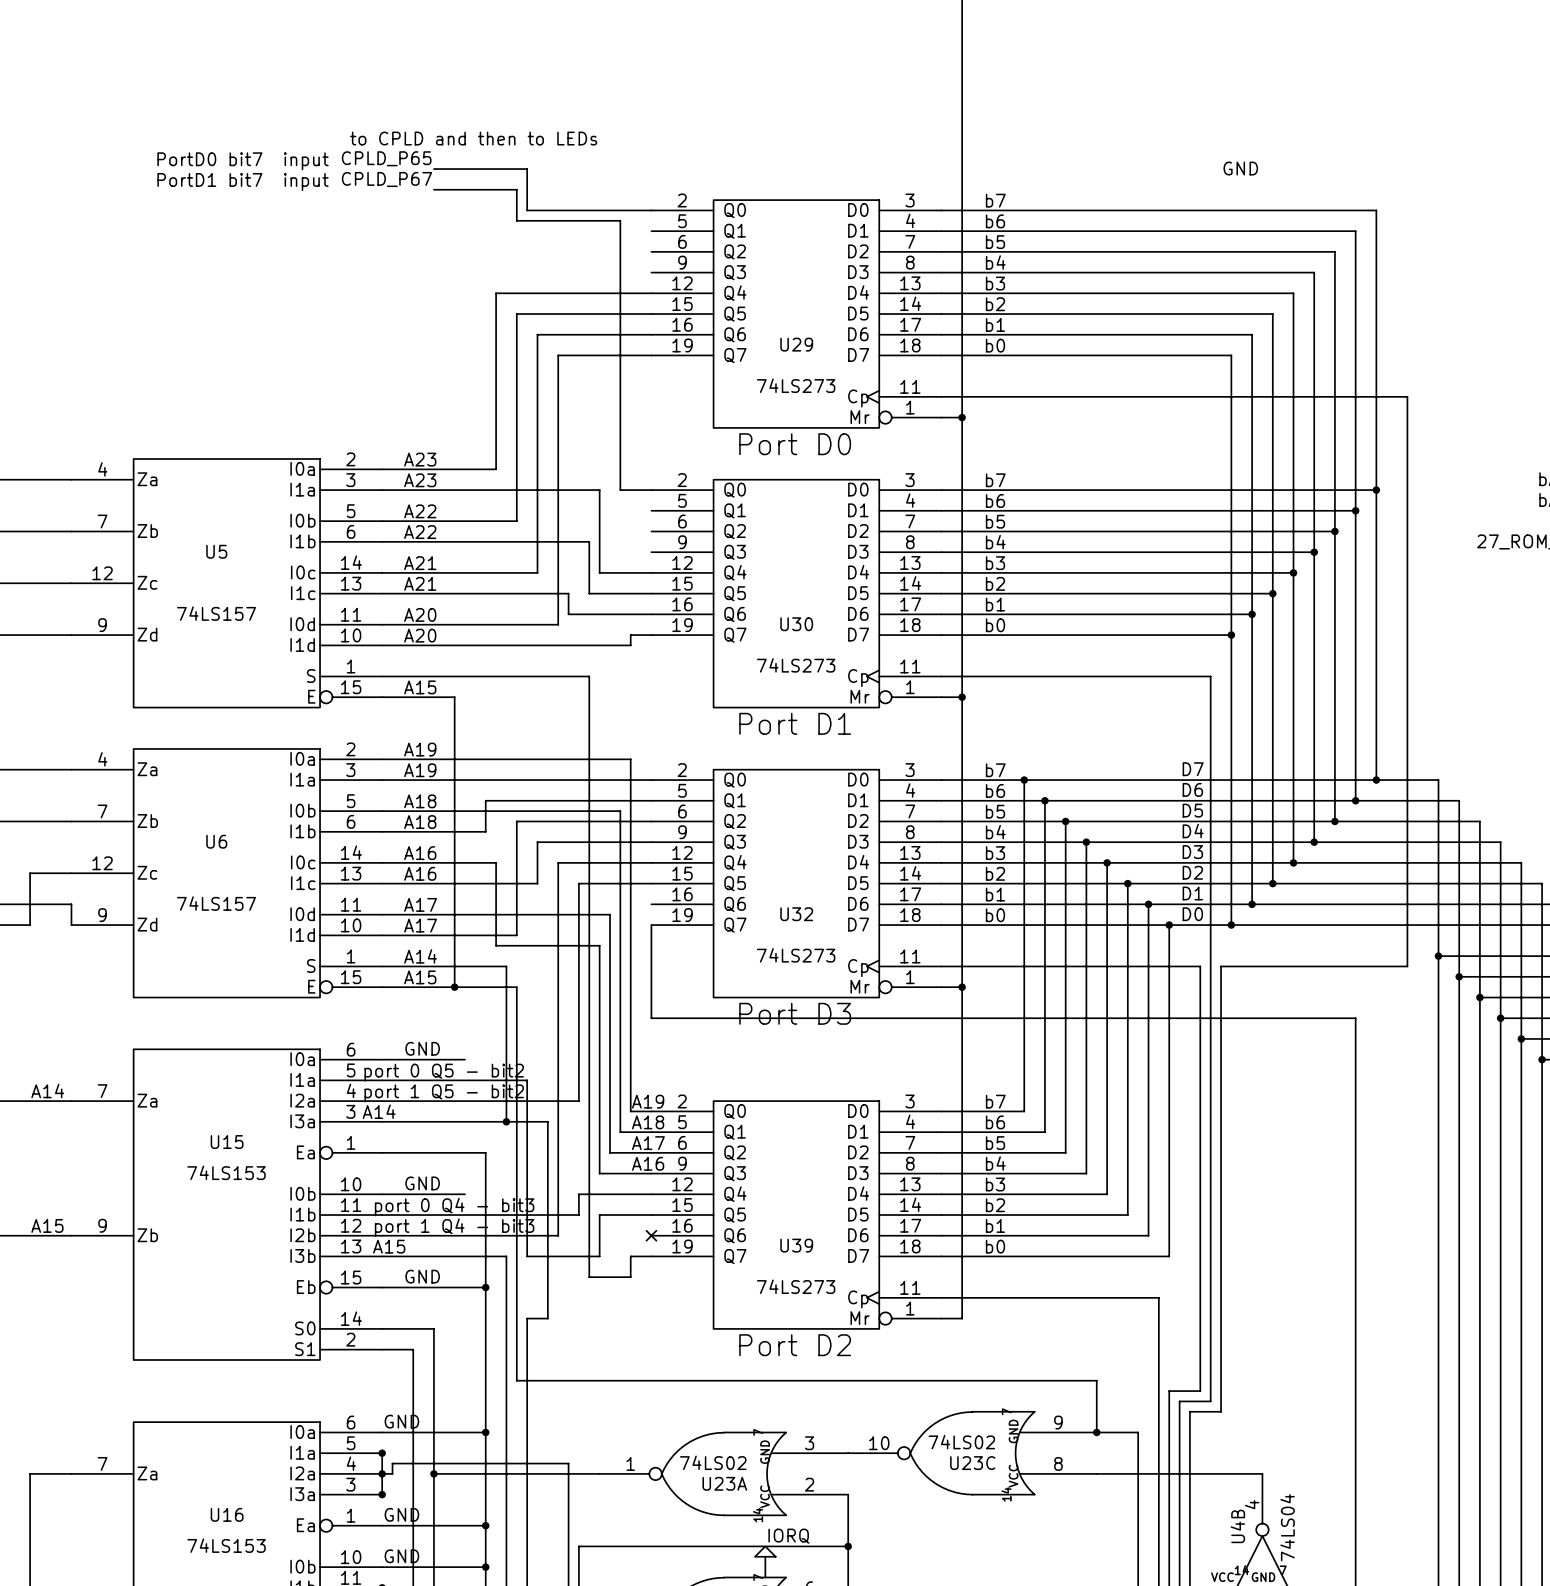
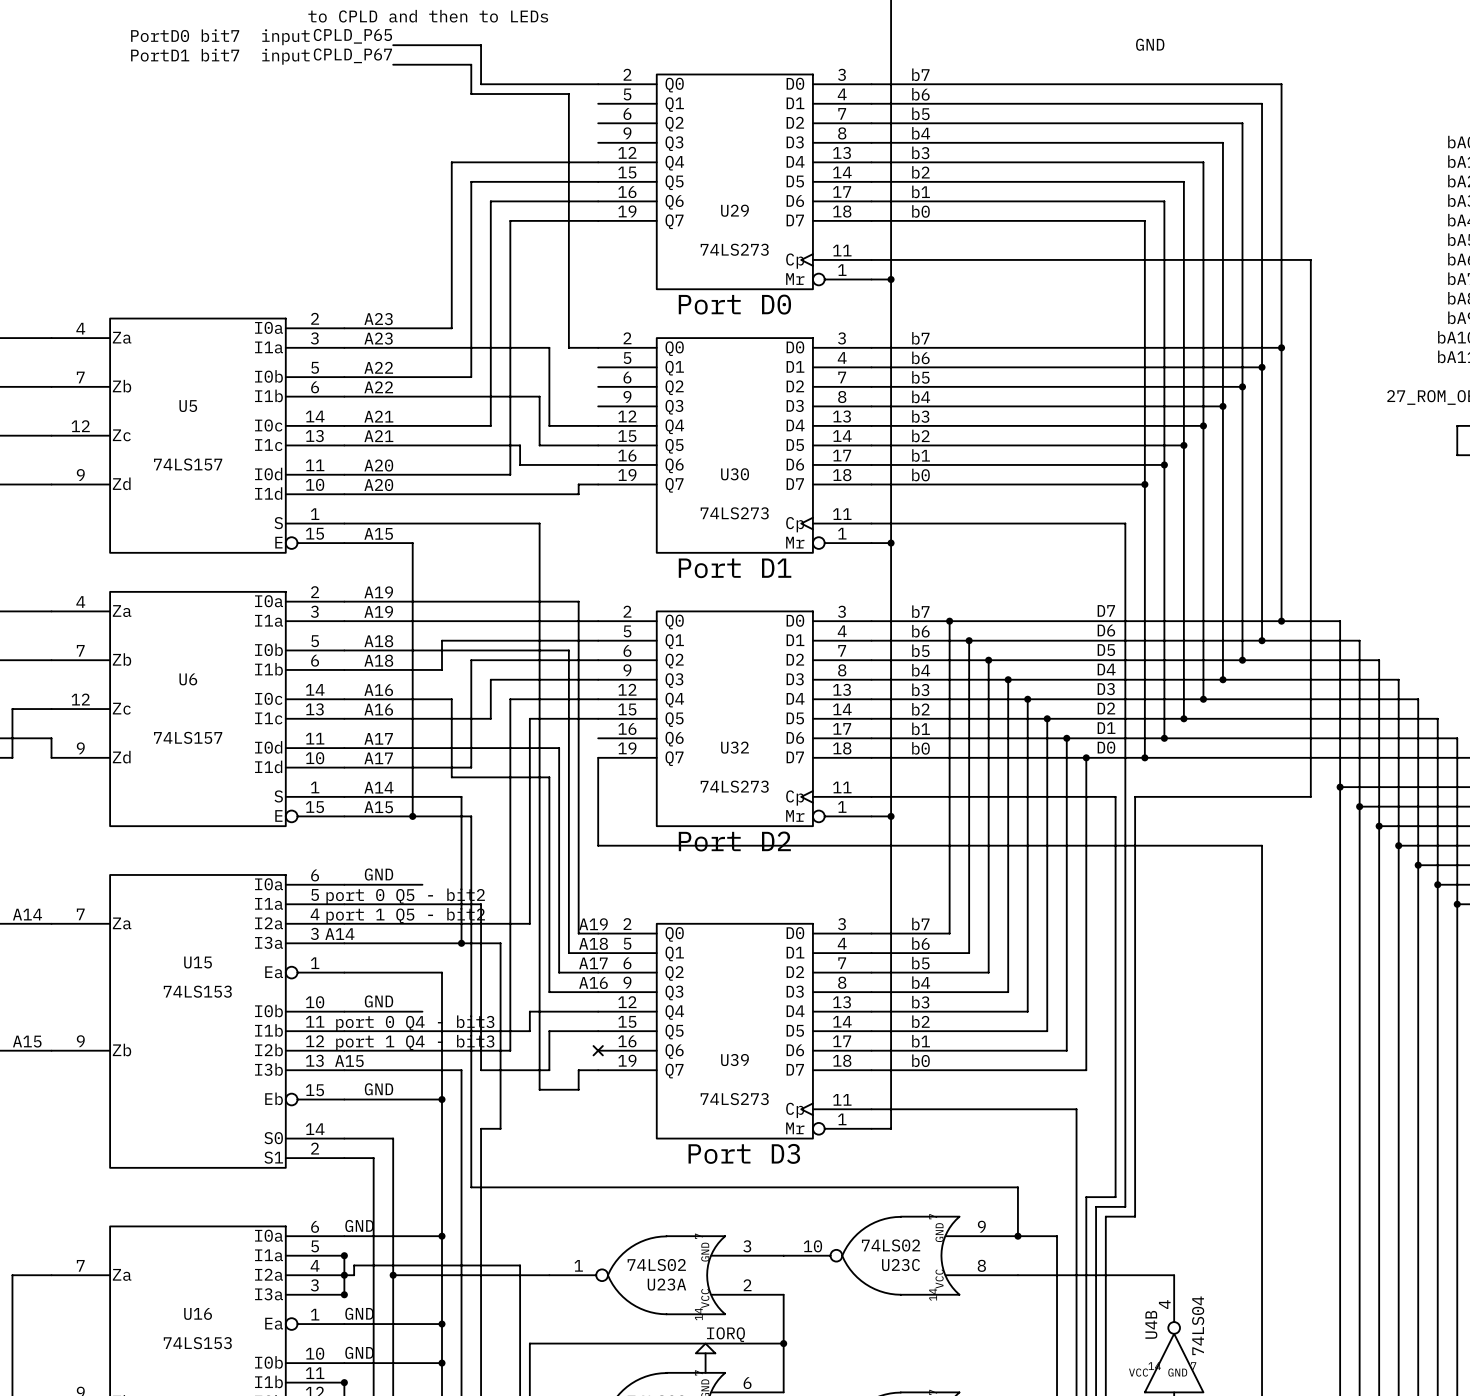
text: Port D3 (795, 1013) -> Port D2 (734, 841)
text: Port D2 (795, 1345) -> Port D3 (744, 1153)

